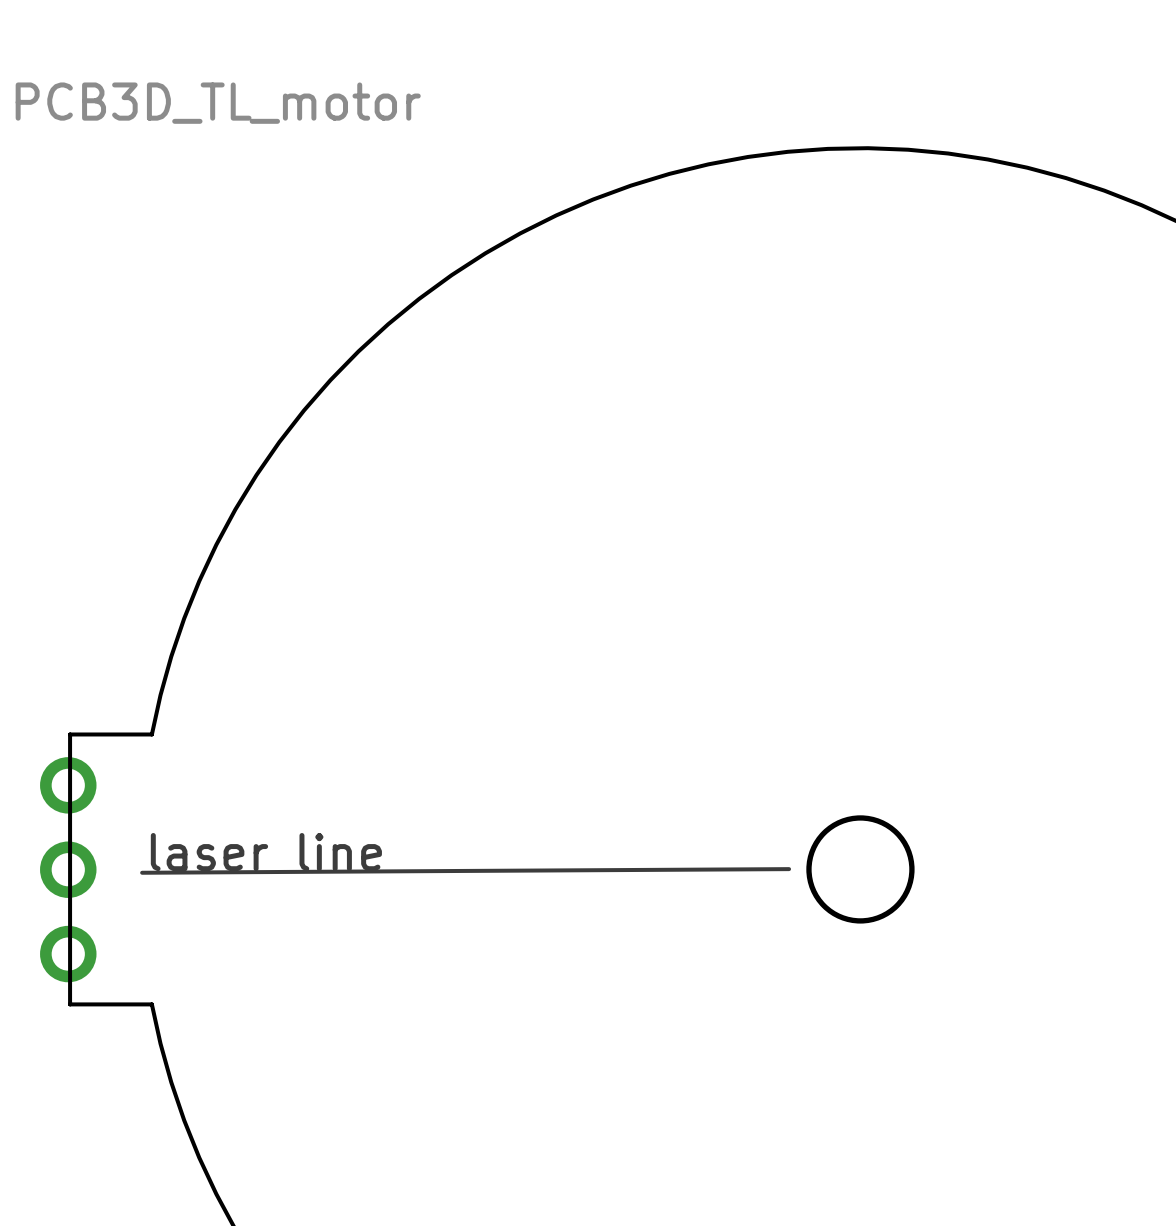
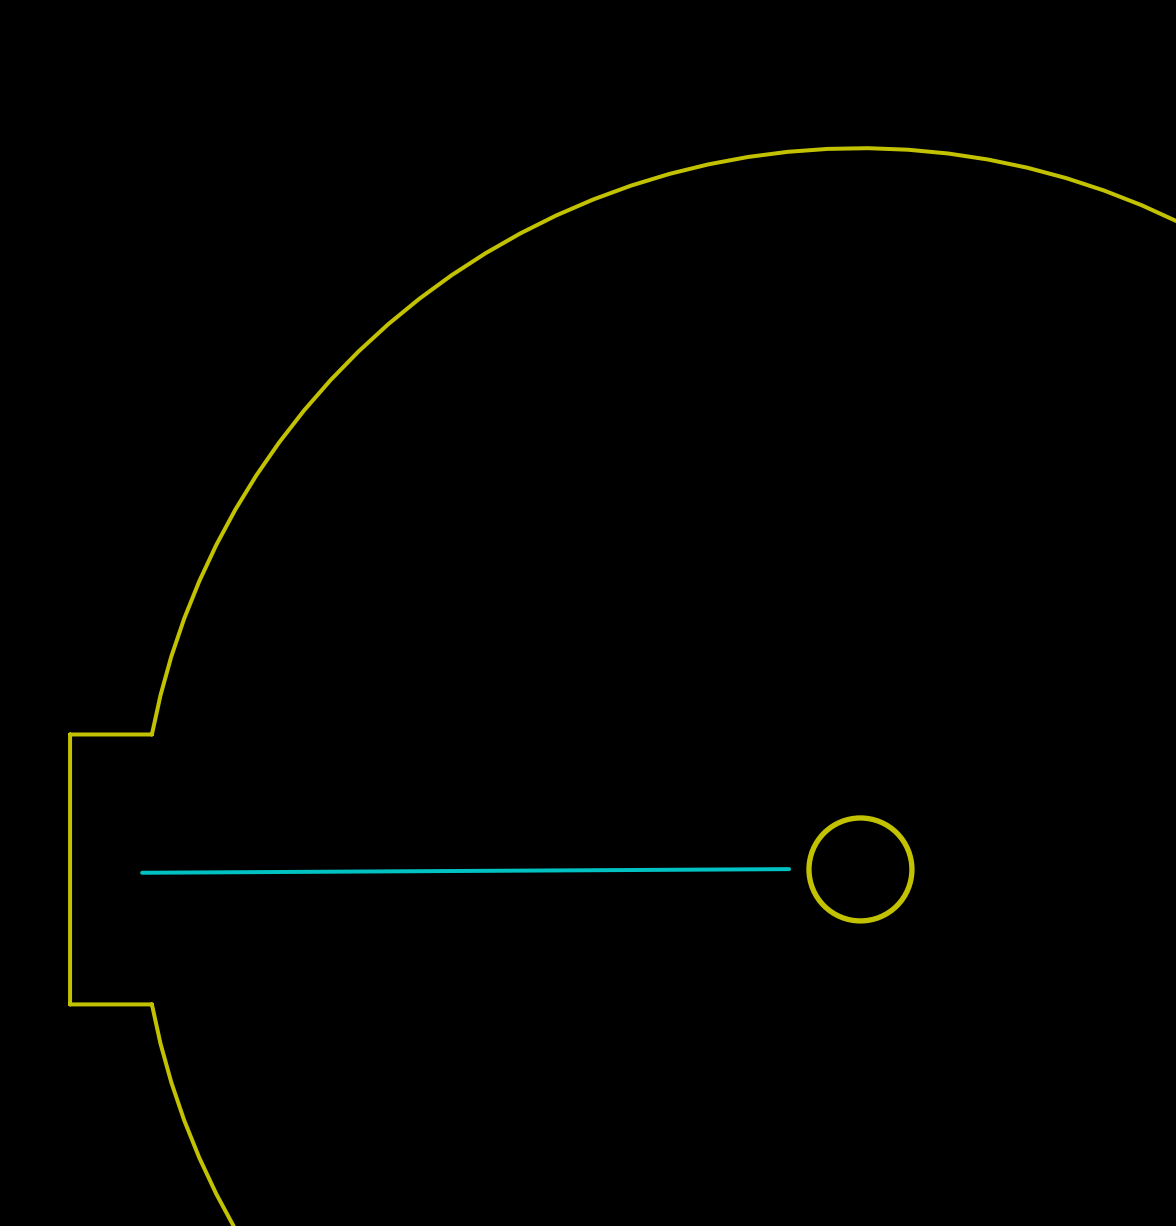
text: PCB3D_TL_motor (218, 103) -> none
text: laser line (266, 852) -> none
part: (68, 869) -> none

